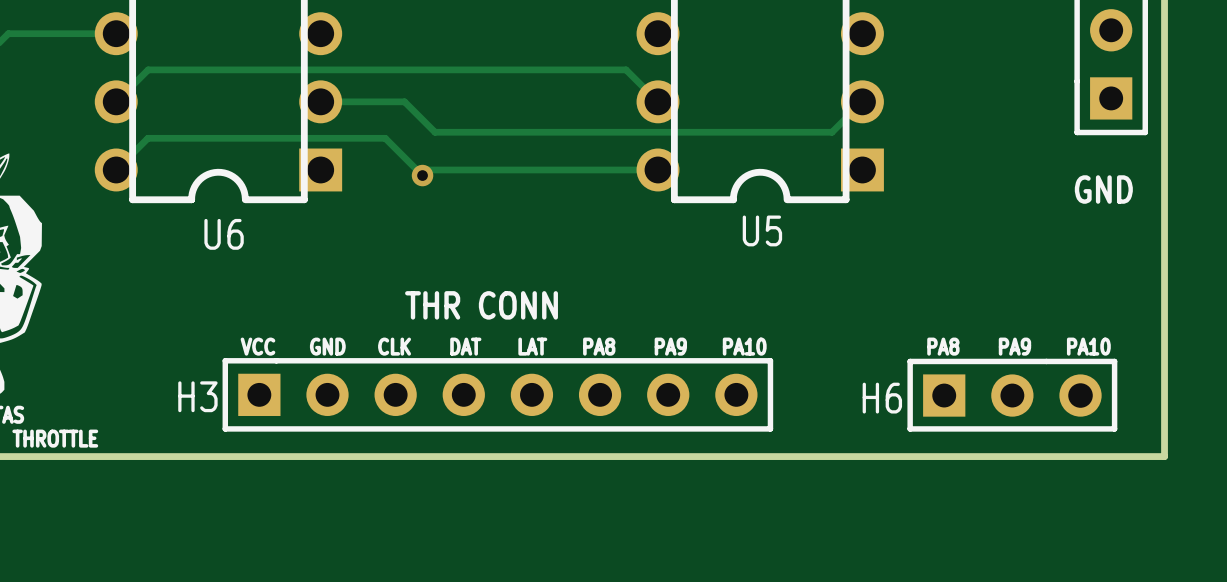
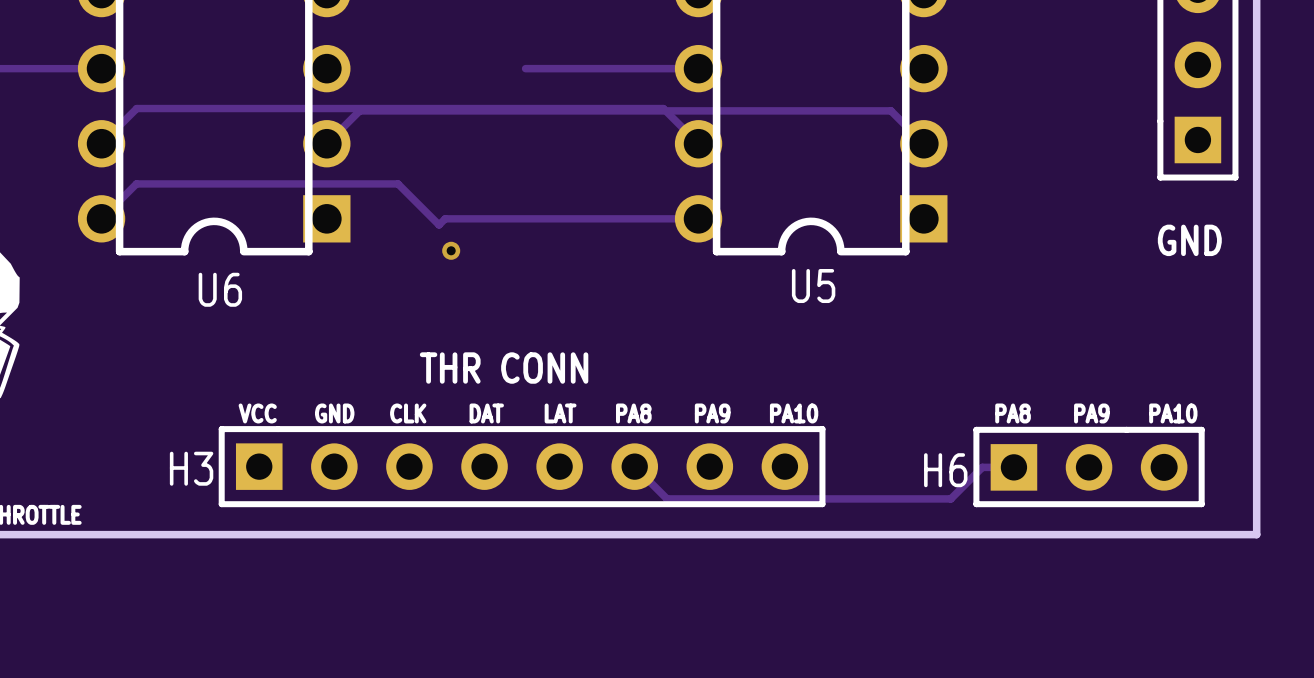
track: none -> (525, 68) (698, 68)
track: (320, 101) (404, 101) (435, 132) (832, 132) (862, 101) -> (326, 143) (359, 110) (890, 110) (923, 143)
via: (422, 175) -> none
via: none -> (451, 250)
track: none -> (634, 466) (667, 498) (950, 498) (982, 467) (1013, 467)

